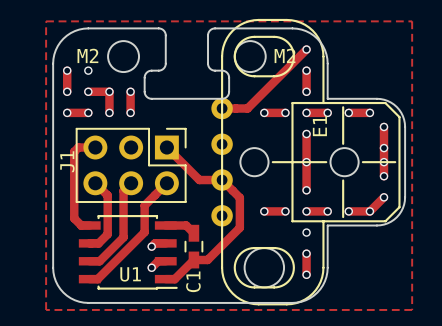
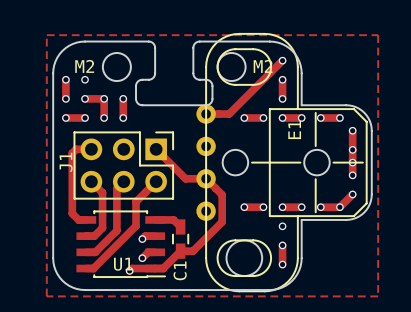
track: (306, 133) (306, 190) -> none
via: (306, 133) -> none
via: (306, 162) -> none
via: (306, 190) -> none
track: none -> (155, 268) (132, 268) (129, 270)
via: none -> (129, 270)

